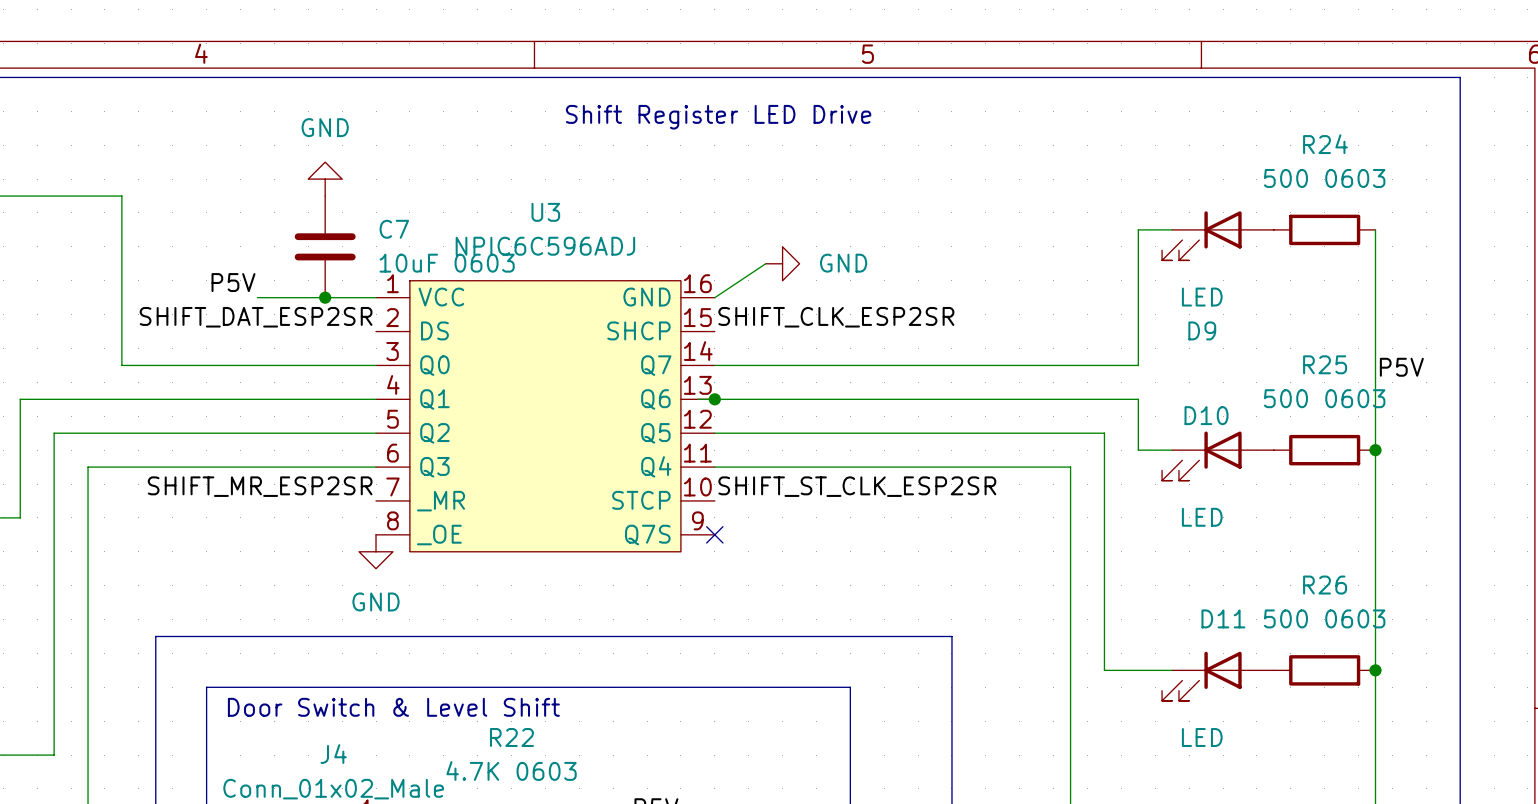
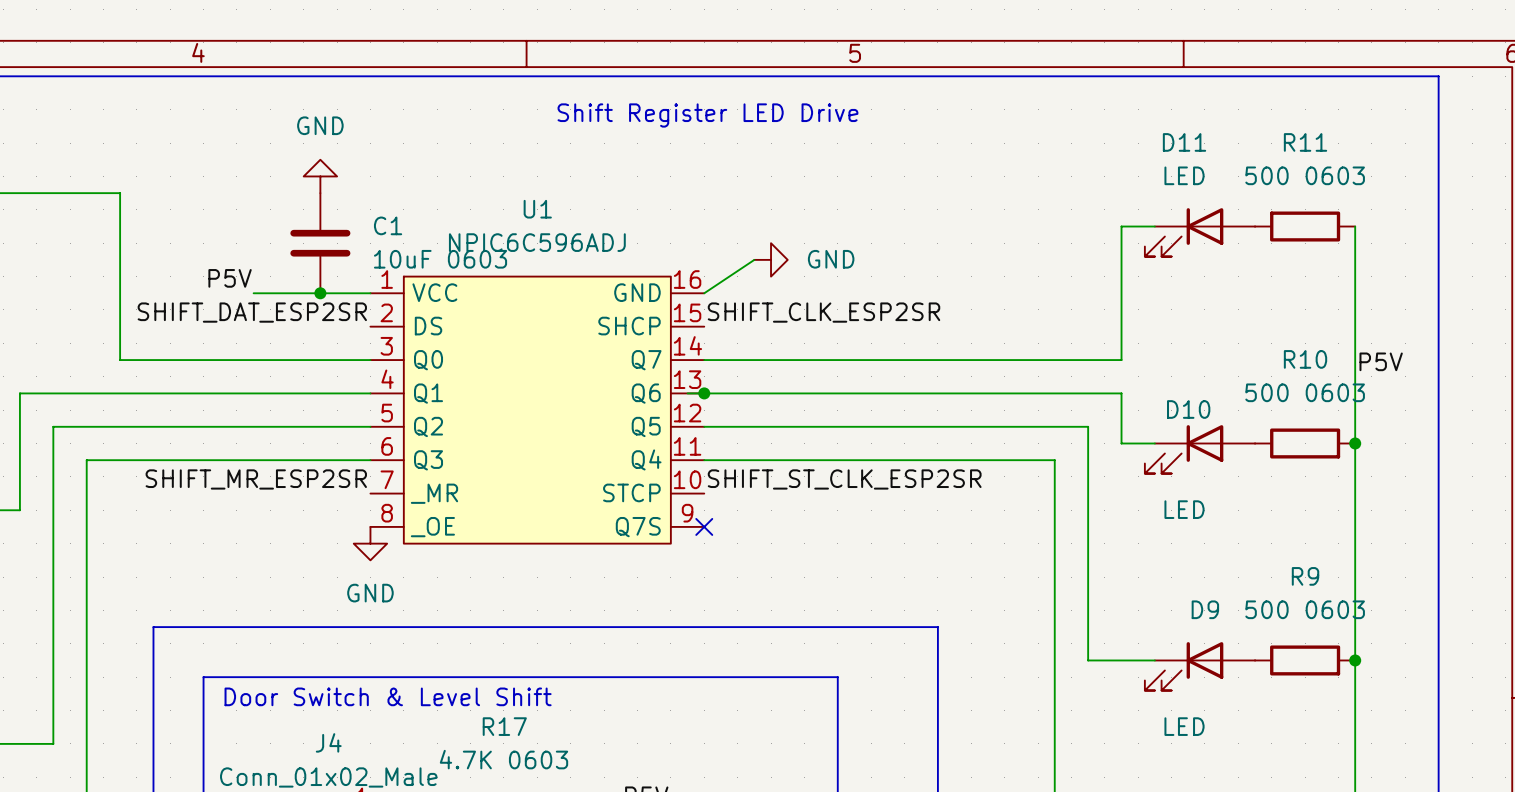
R24 name: R24 (1325, 144) -> R11 (1305, 142)
U3 name: U3 (545, 212) -> U1 (537, 209)
C7 name: C7 (394, 229) -> C1 (388, 225)
D9 value position: LED (1202, 297) -> LED (1184, 175)
D9 name: D9 (1202, 330) -> D11 (1184, 142)
R25 name: R25 (1325, 364) -> R10 (1305, 359)
R26 name: R26 (1325, 585) -> R9 (1305, 576)
D11 name: D11 (1223, 618) -> D9 (1205, 609)
R22 name: R22 (511, 737) -> R17 (504, 726)

